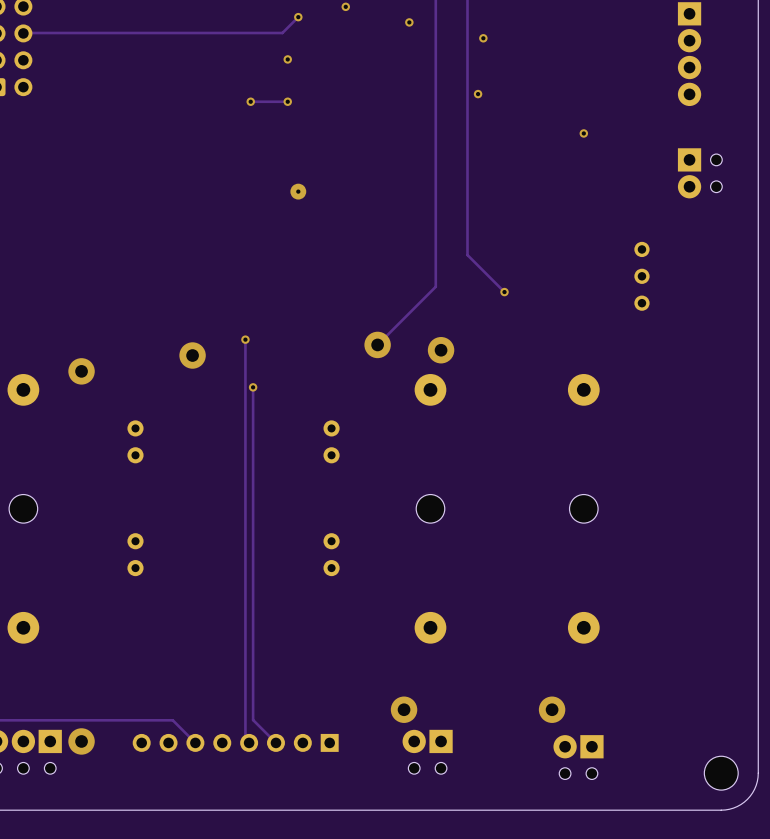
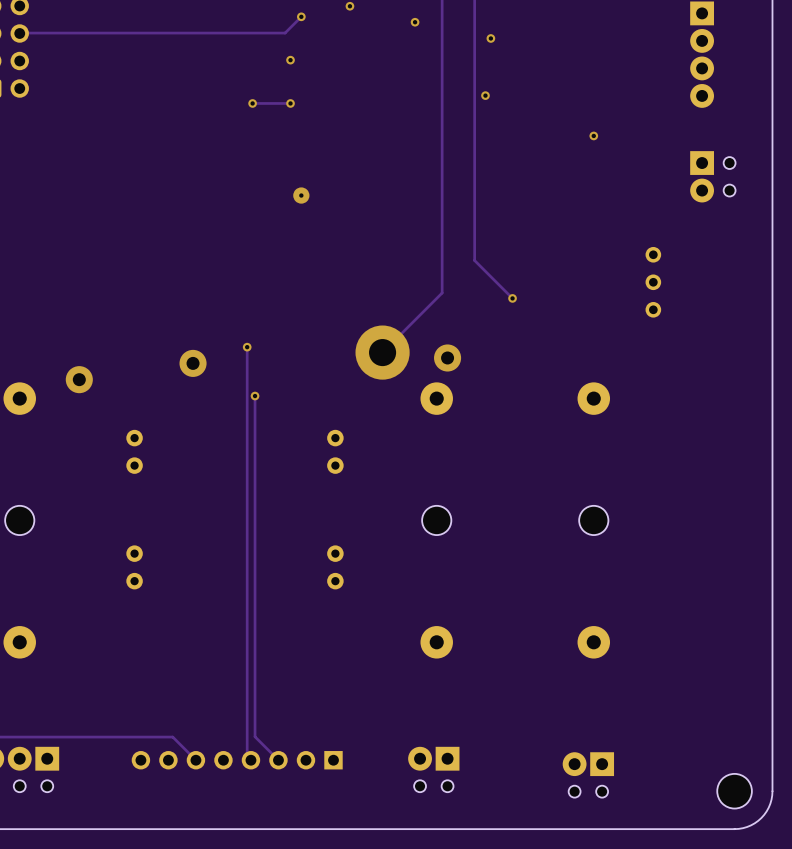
via size: [364, 331, 391, 359] -> [355, 325, 410, 380]
via: (404, 709) -> none
via: (552, 709) -> none
via: (81, 741) -> none

